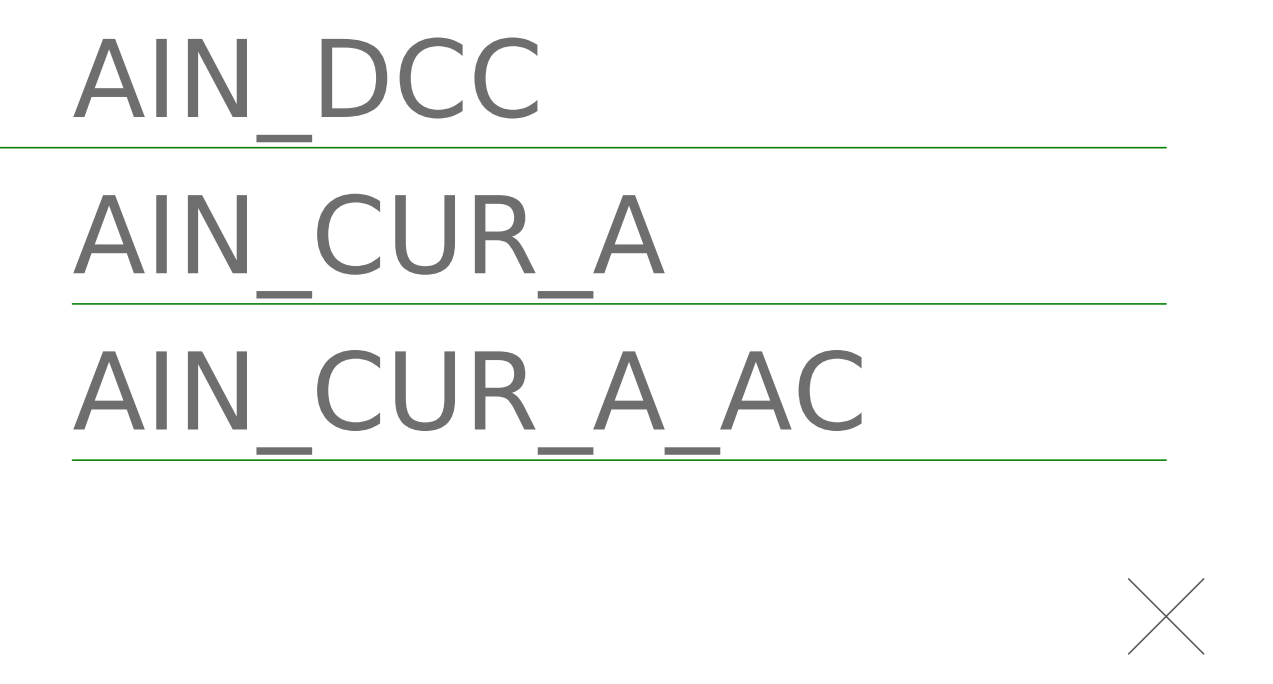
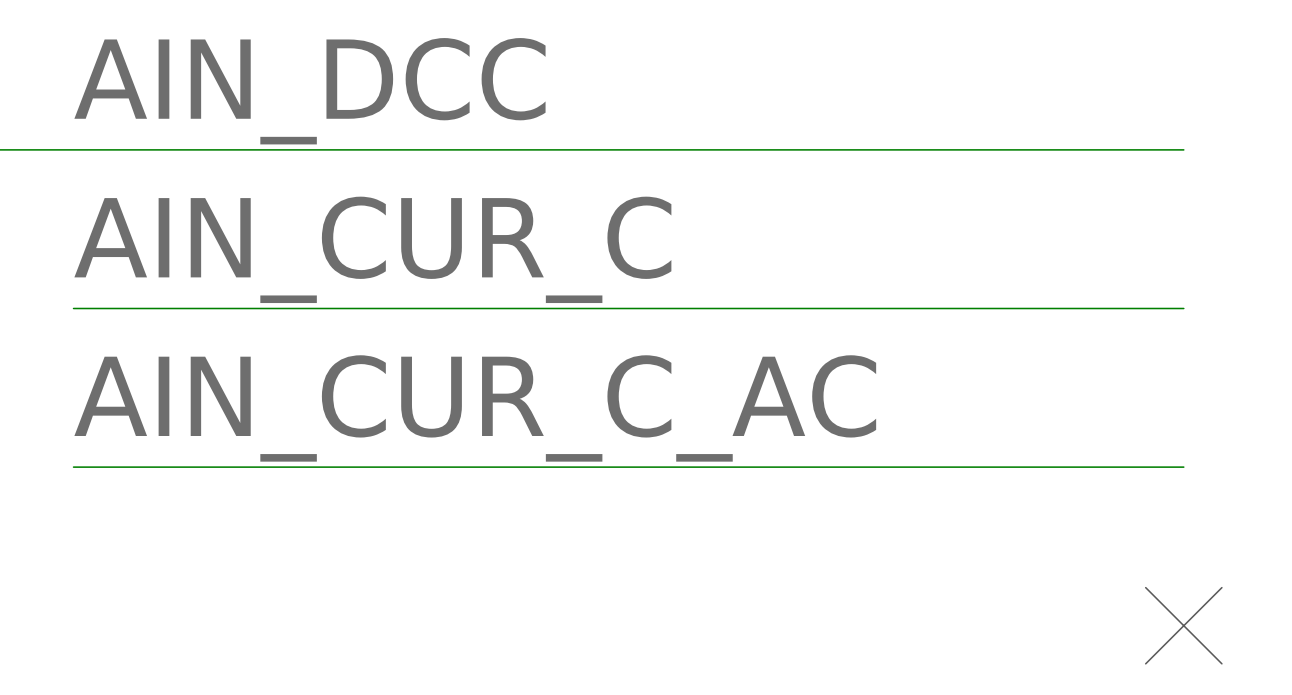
label: AIN_CUR_A (369, 246) -> AIN_CUR_C (372, 249)
label: AIN_CUR_A_AC (467, 402) -> AIN_CUR_C_AC (475, 408)

